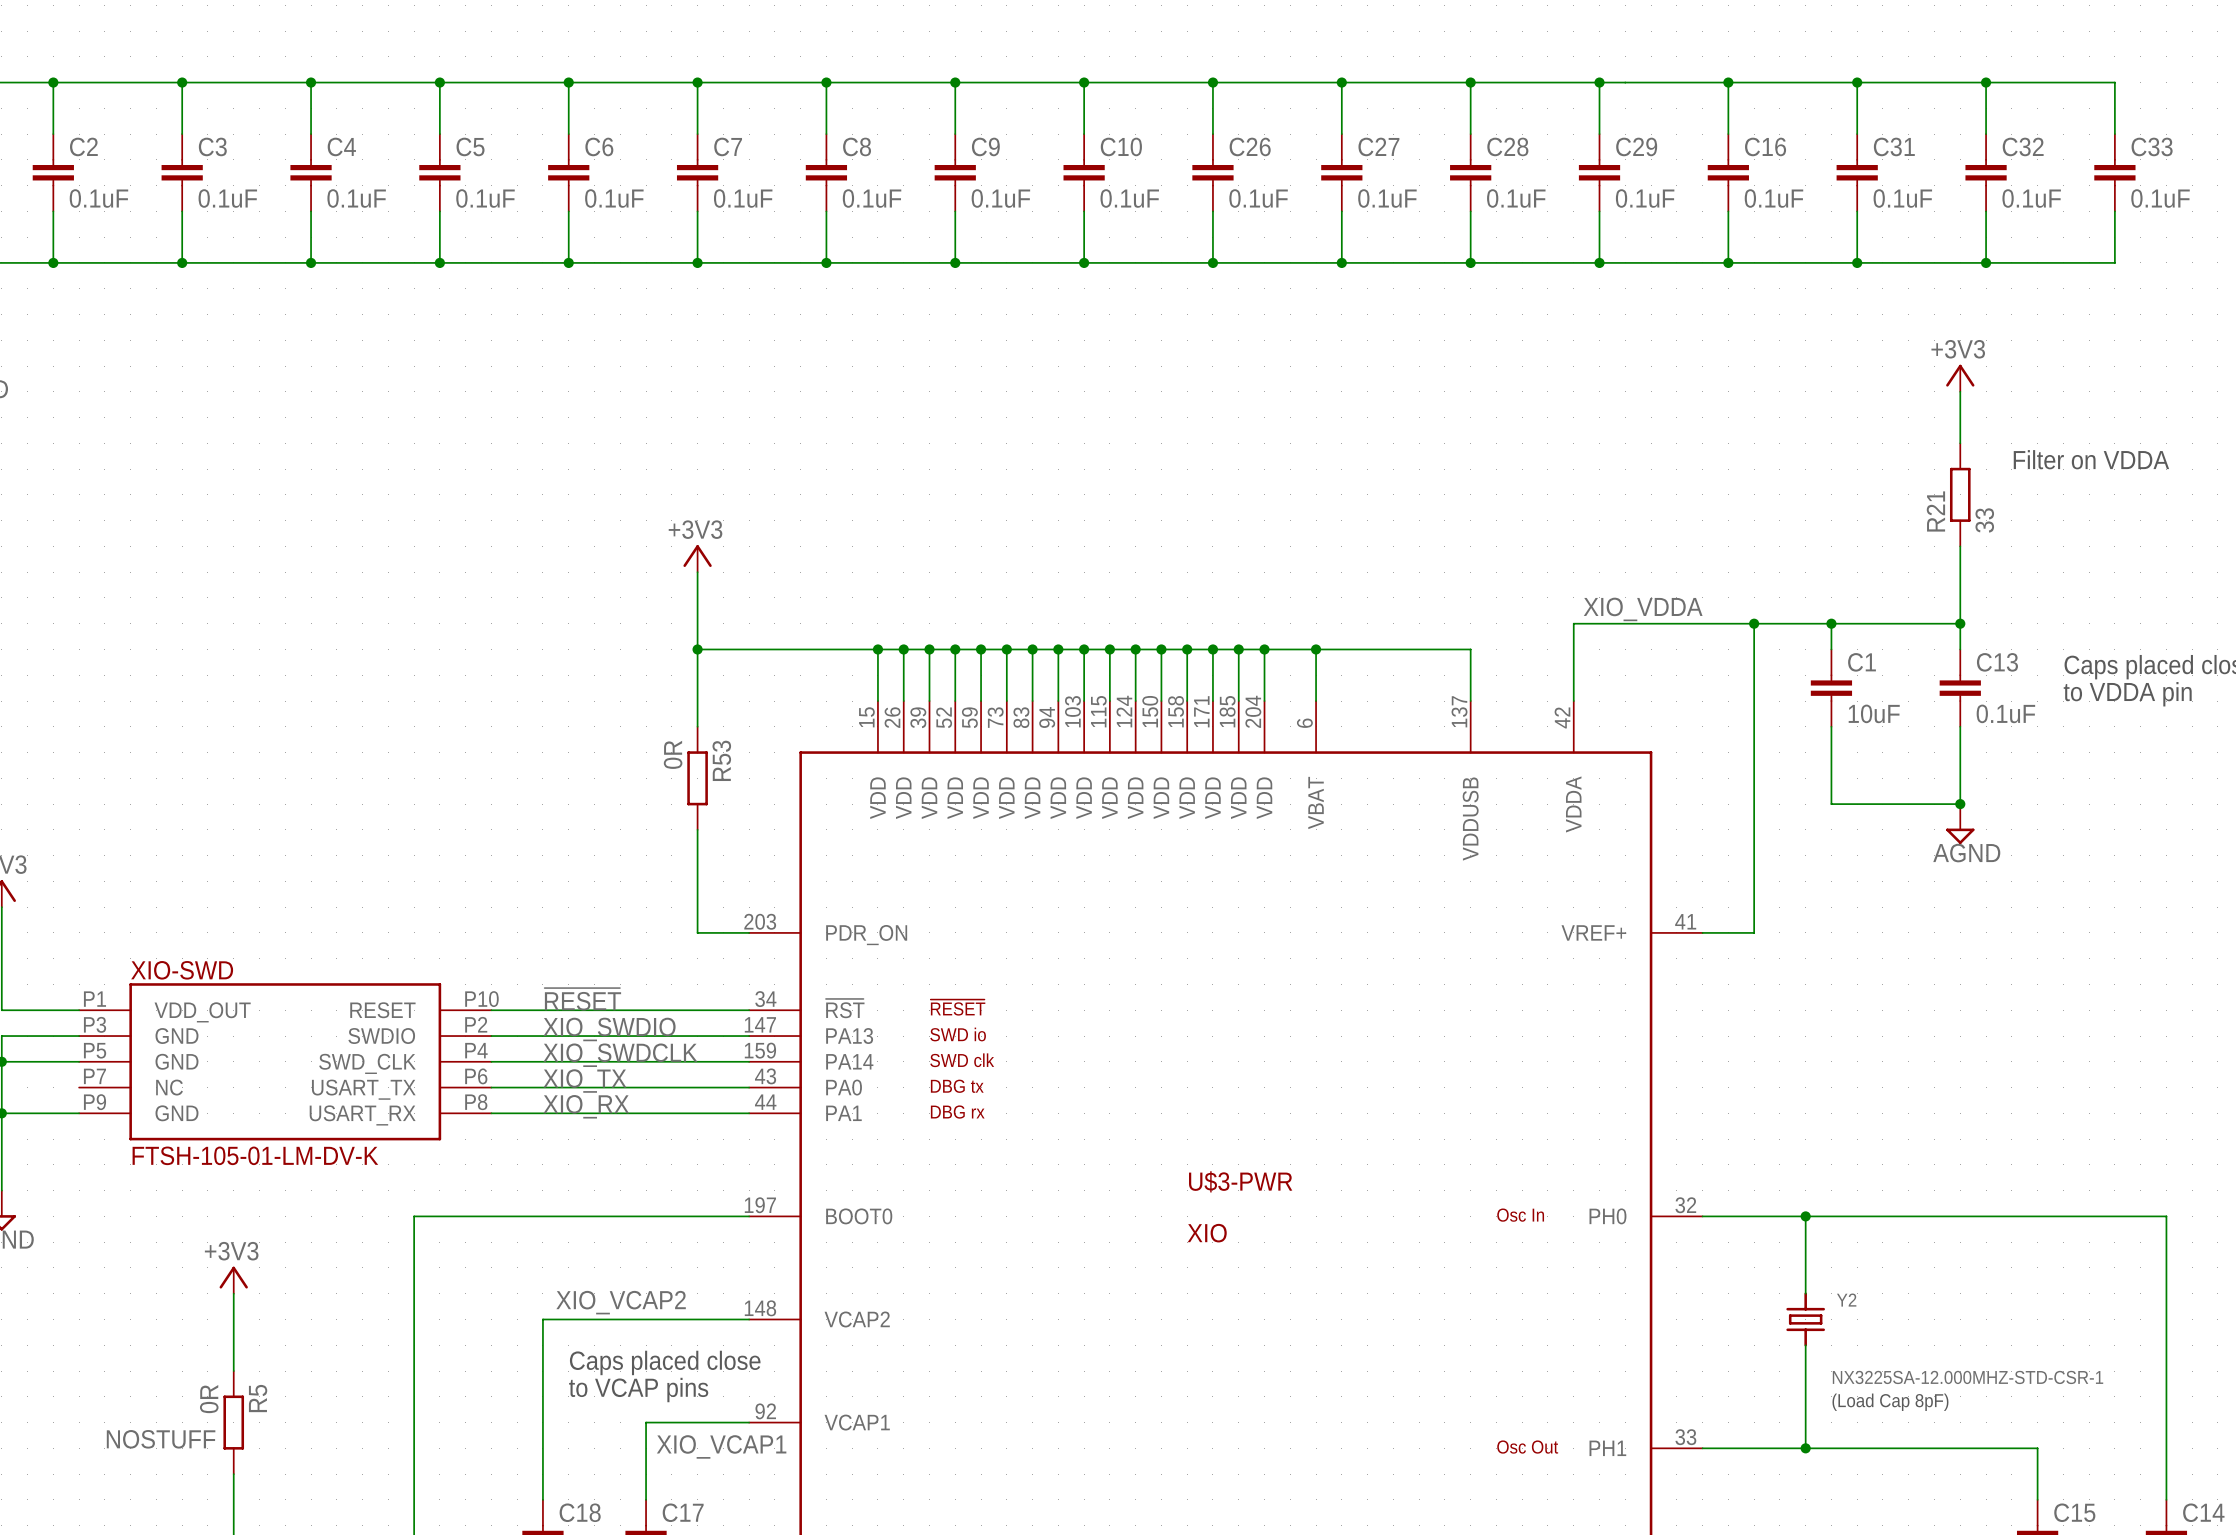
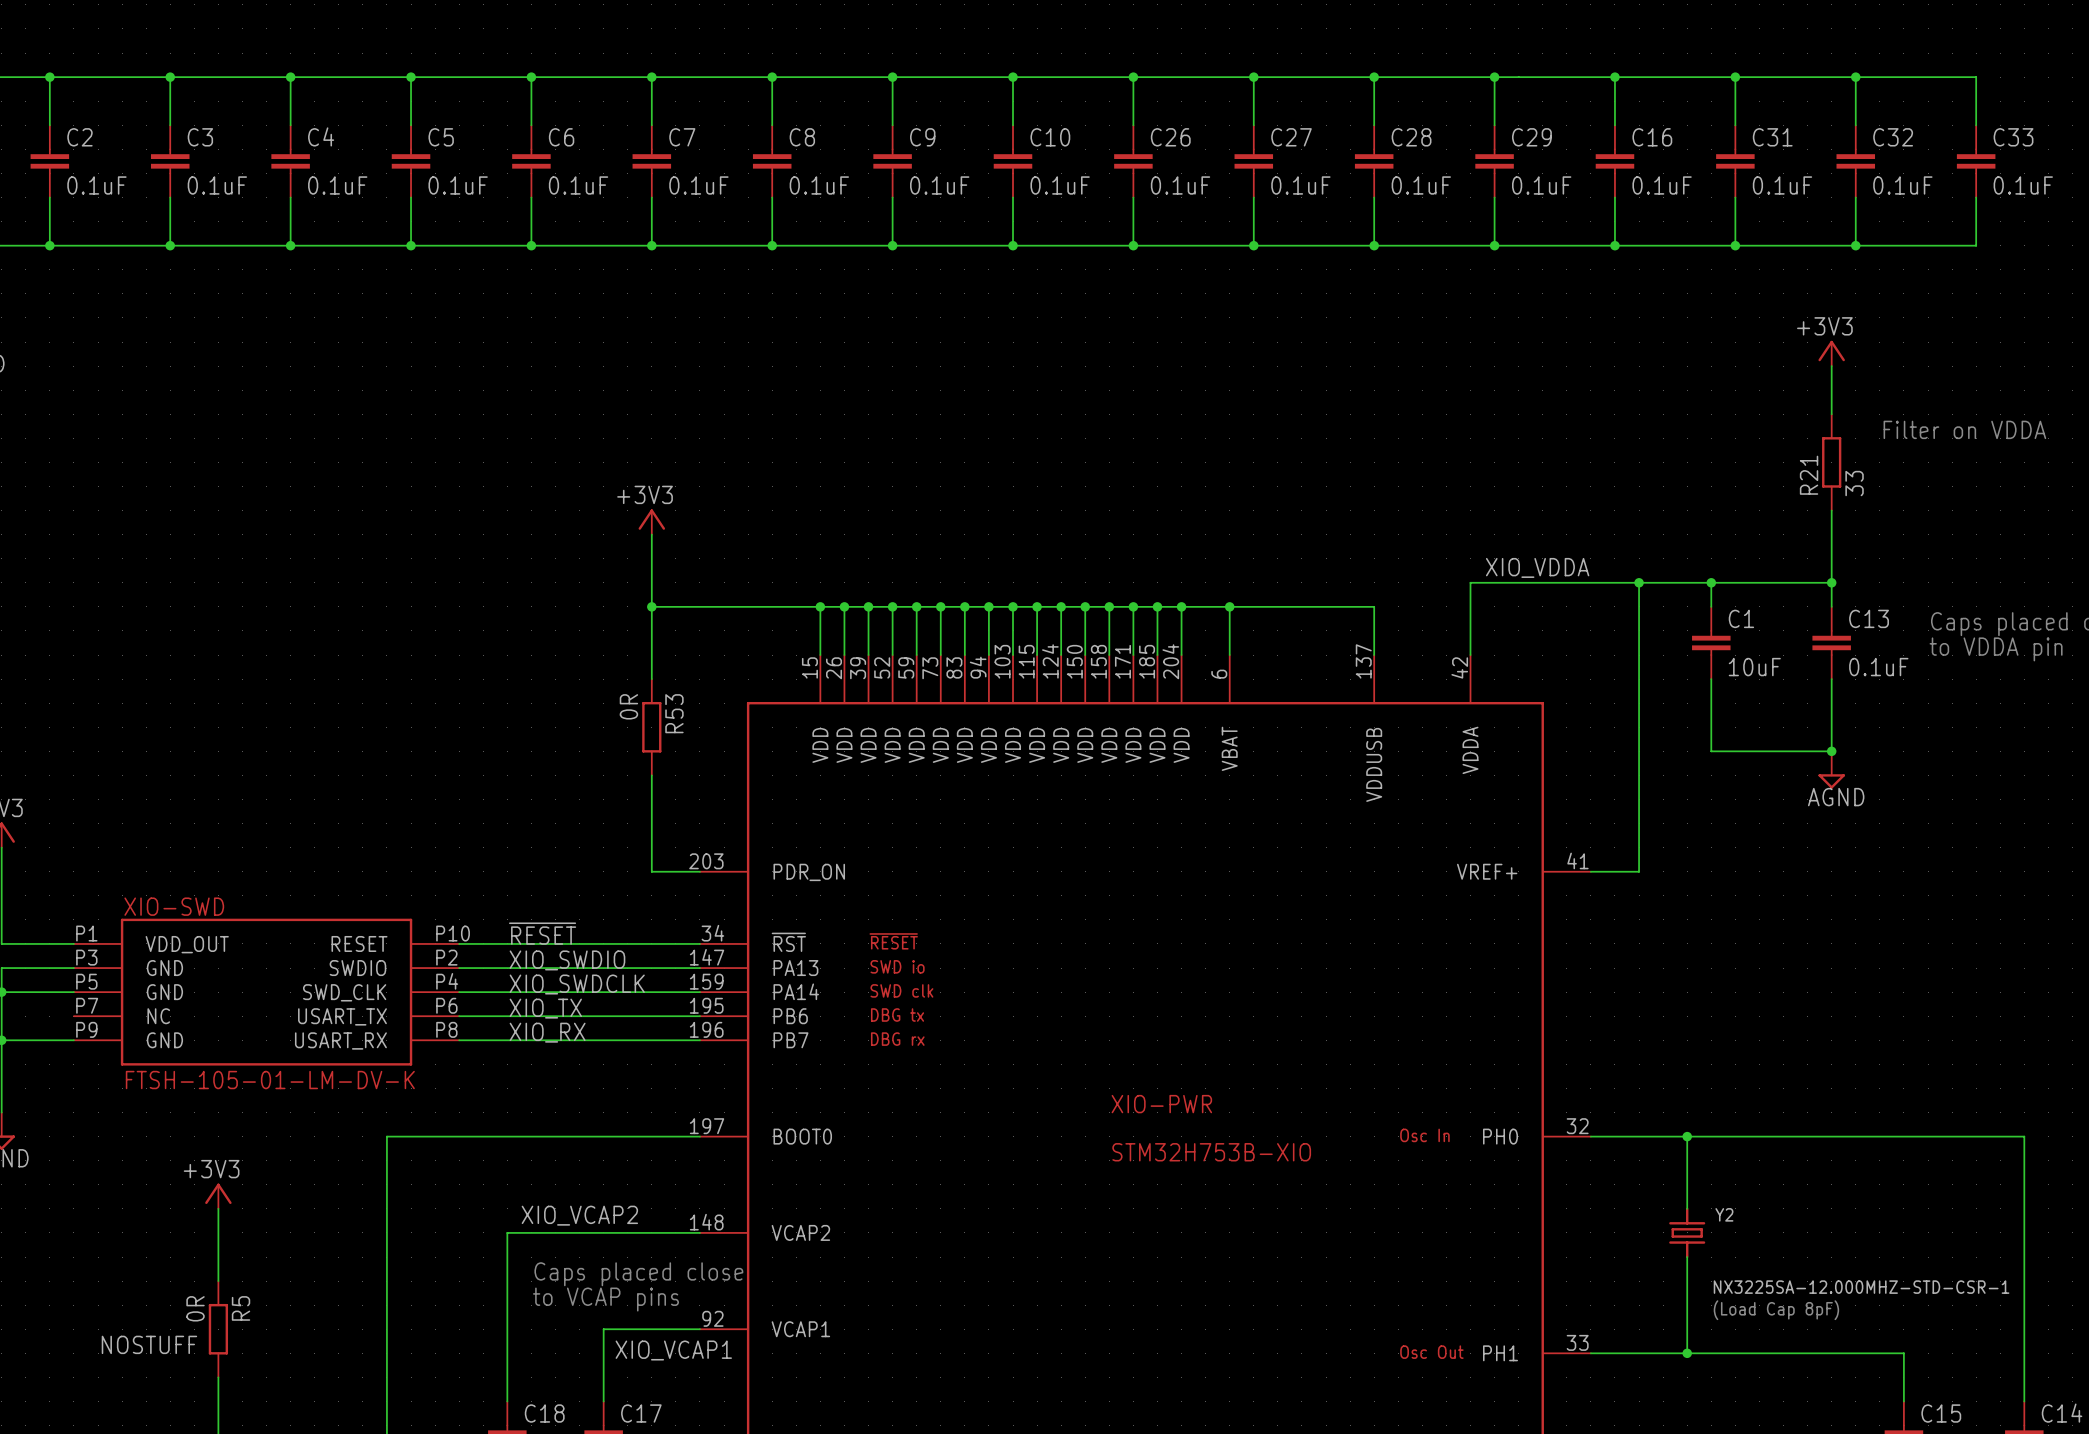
U$3-PWR pin number: 43 (765, 1076) -> 195 (706, 1005)
U$3-PWR pin name: PA0 (844, 1087) -> PB6 (790, 1016)
U$3-PWR pin number: 44 (765, 1102) -> 196 (706, 1029)
U$3-PWR pin name: PA1 (843, 1113) -> PB7 (790, 1040)
U$3-PWR name: U$3-PWR (1240, 1181) -> XIO-PWR (1161, 1104)
U$3-PWR value: XIO (1207, 1233) -> STM32H753B-XIO (1211, 1152)

